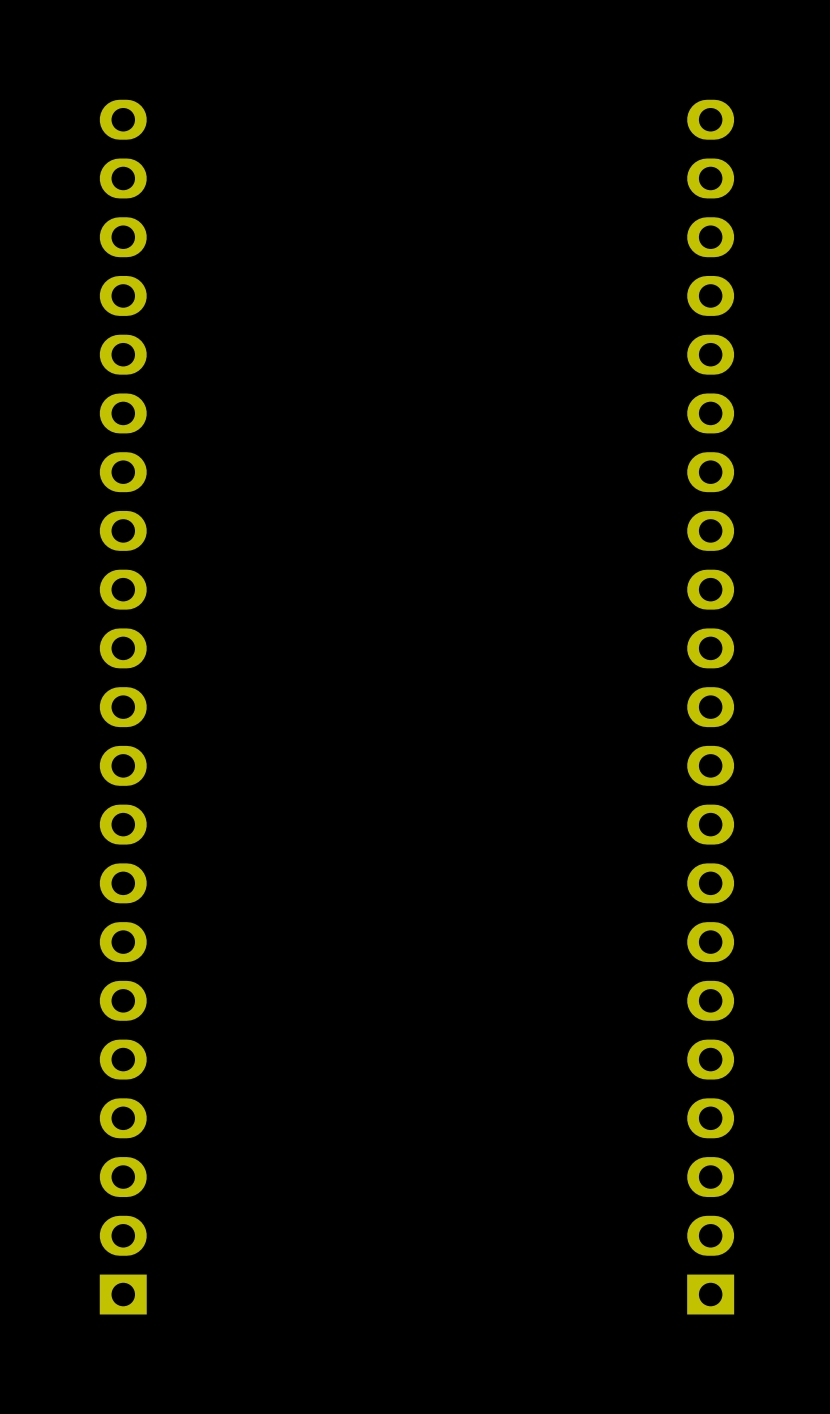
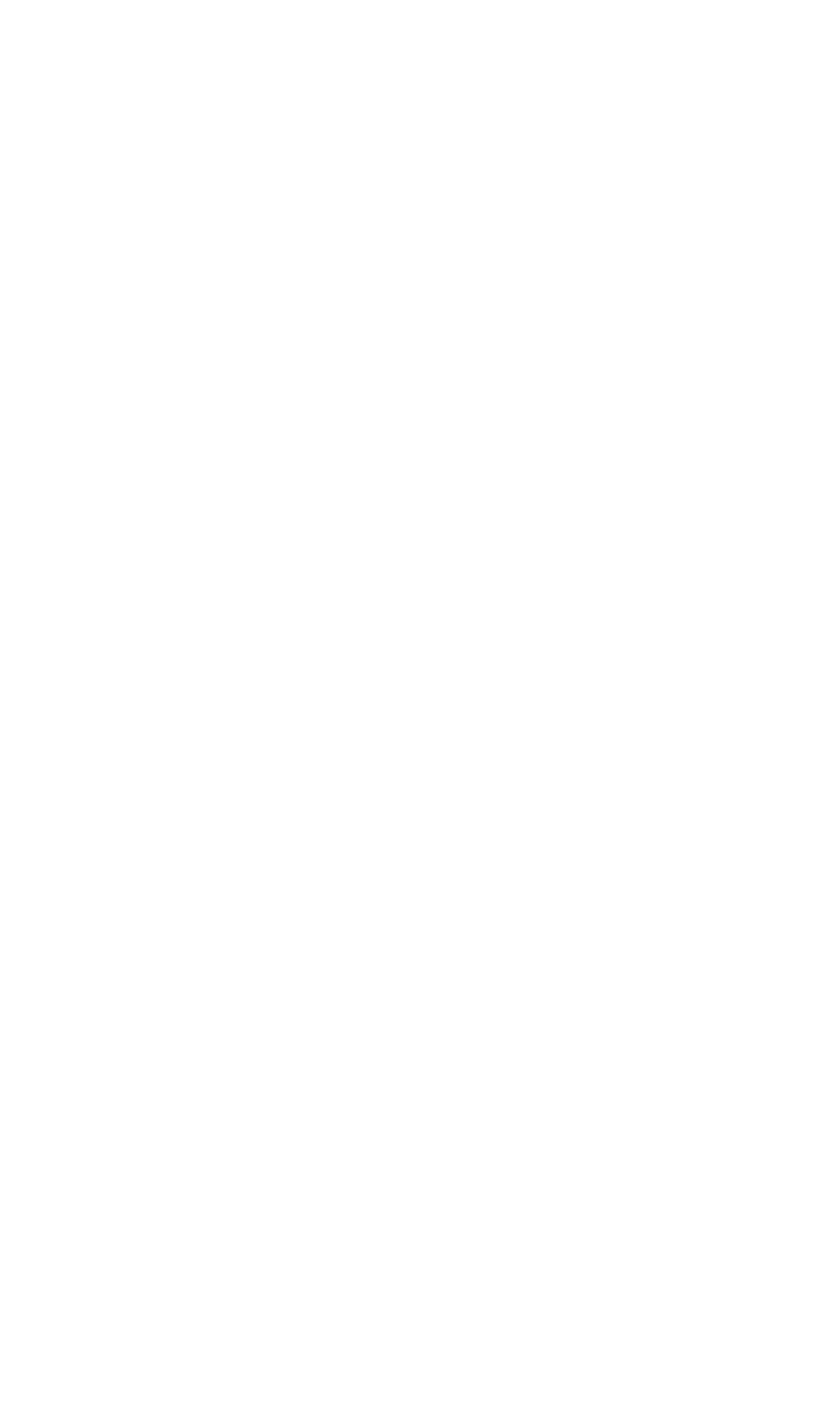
part: (123, 707) -> none
part: (710, 707) -> none

